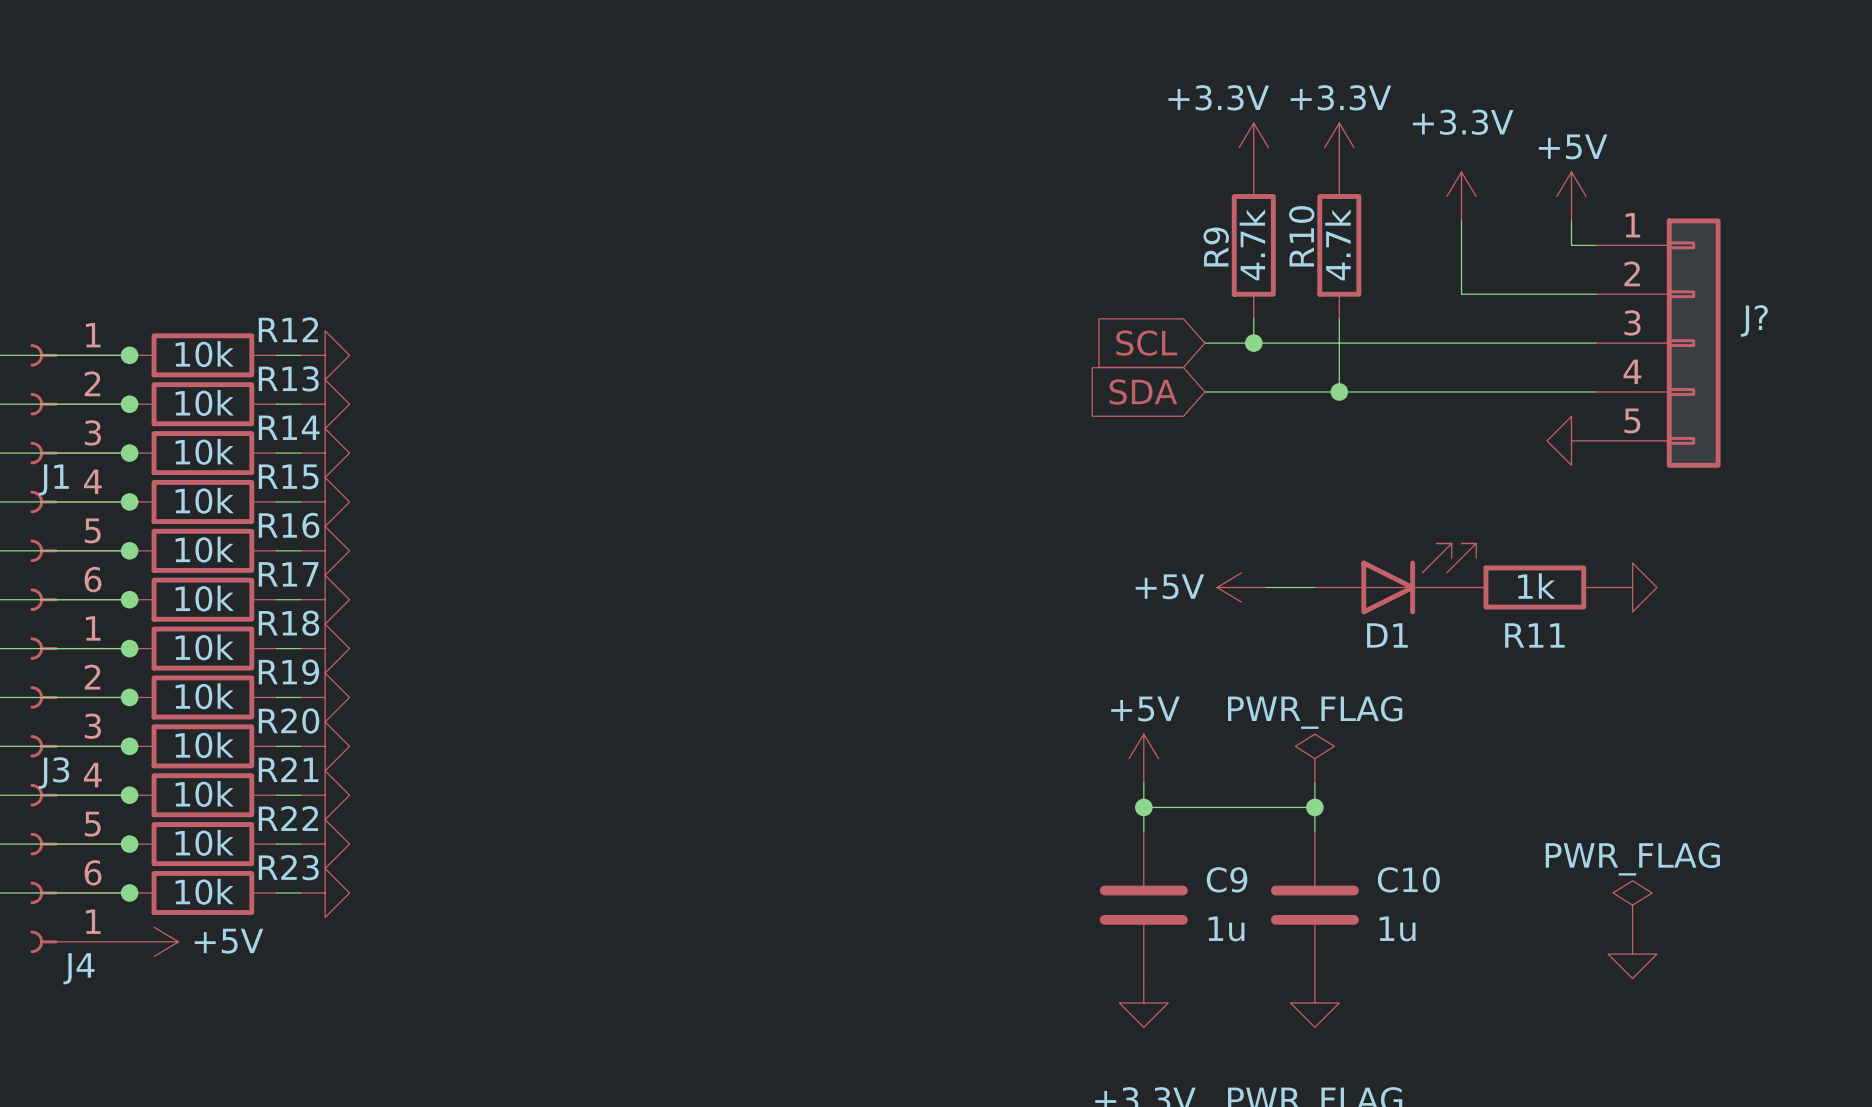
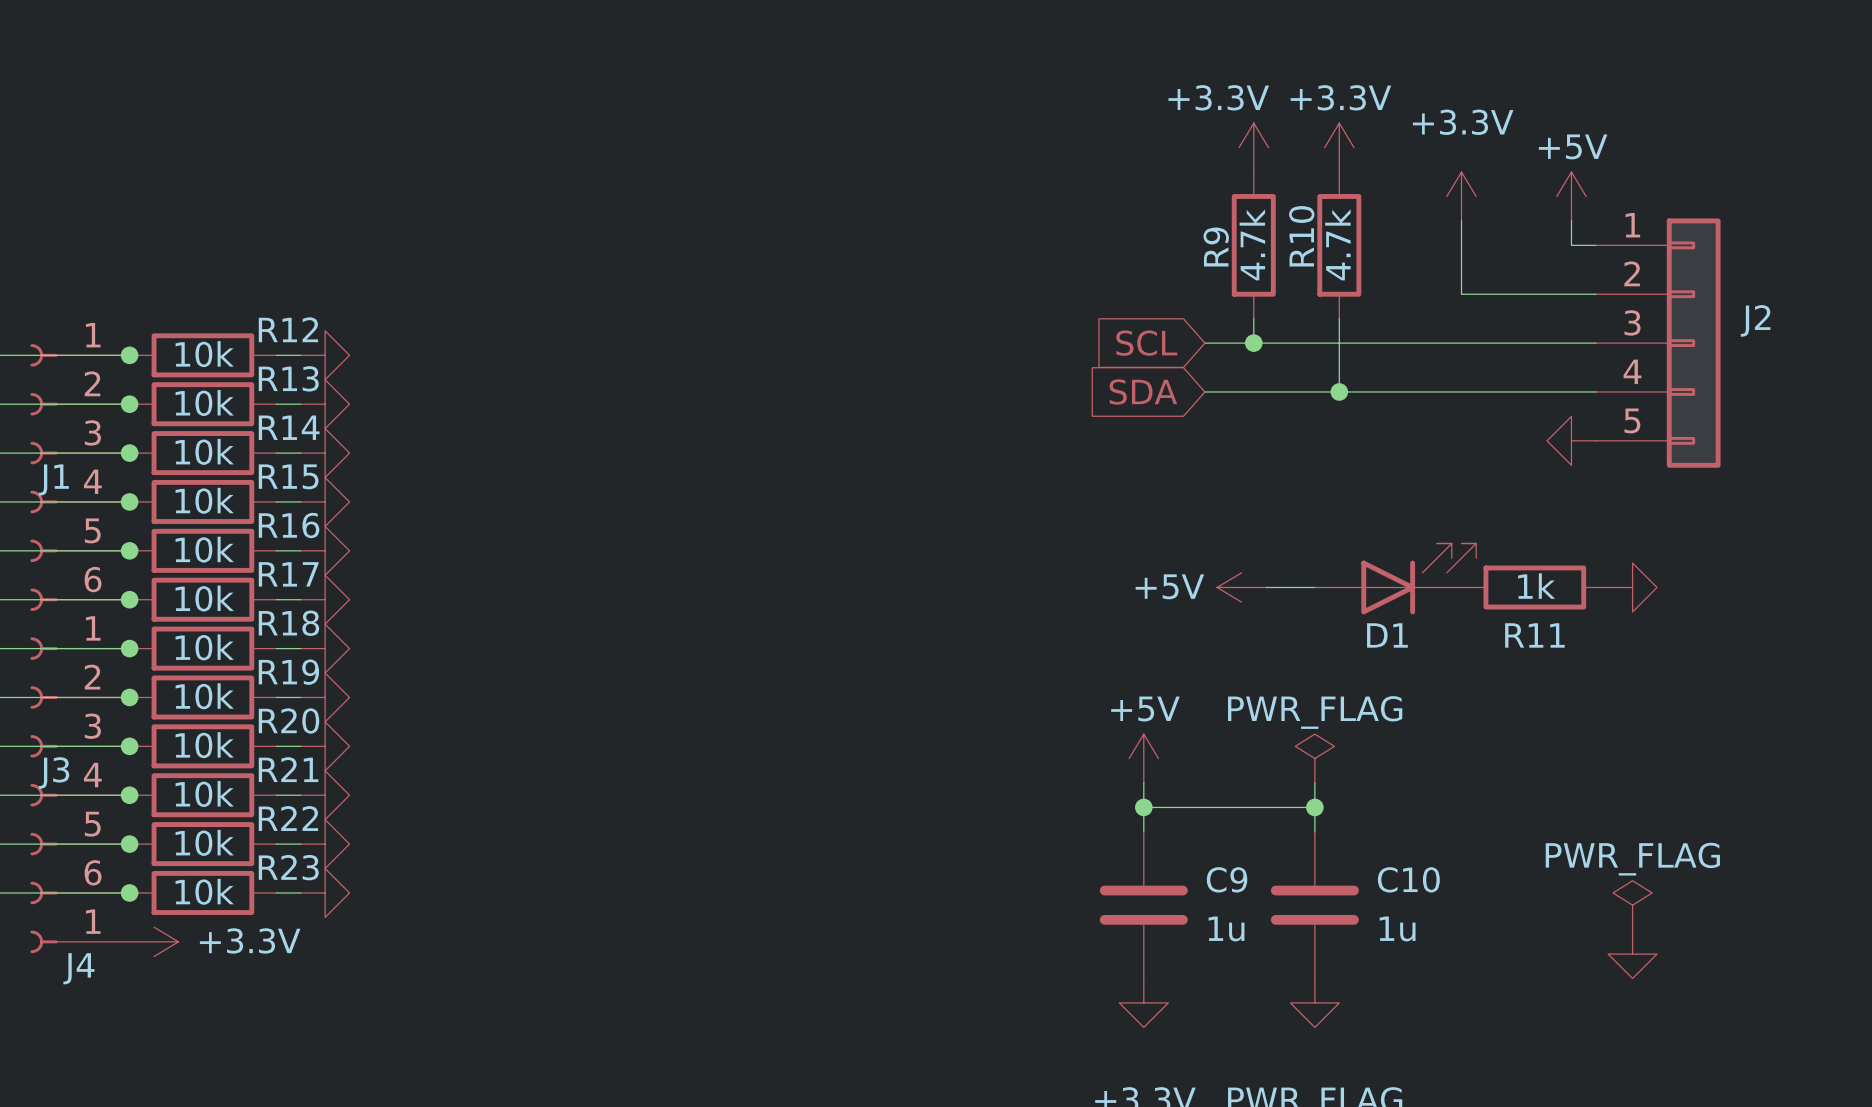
J? name: J? (1754, 320) -> J2 (1755, 320)
power symbol: +5V (154, 941) -> +3.3V (154, 941)

